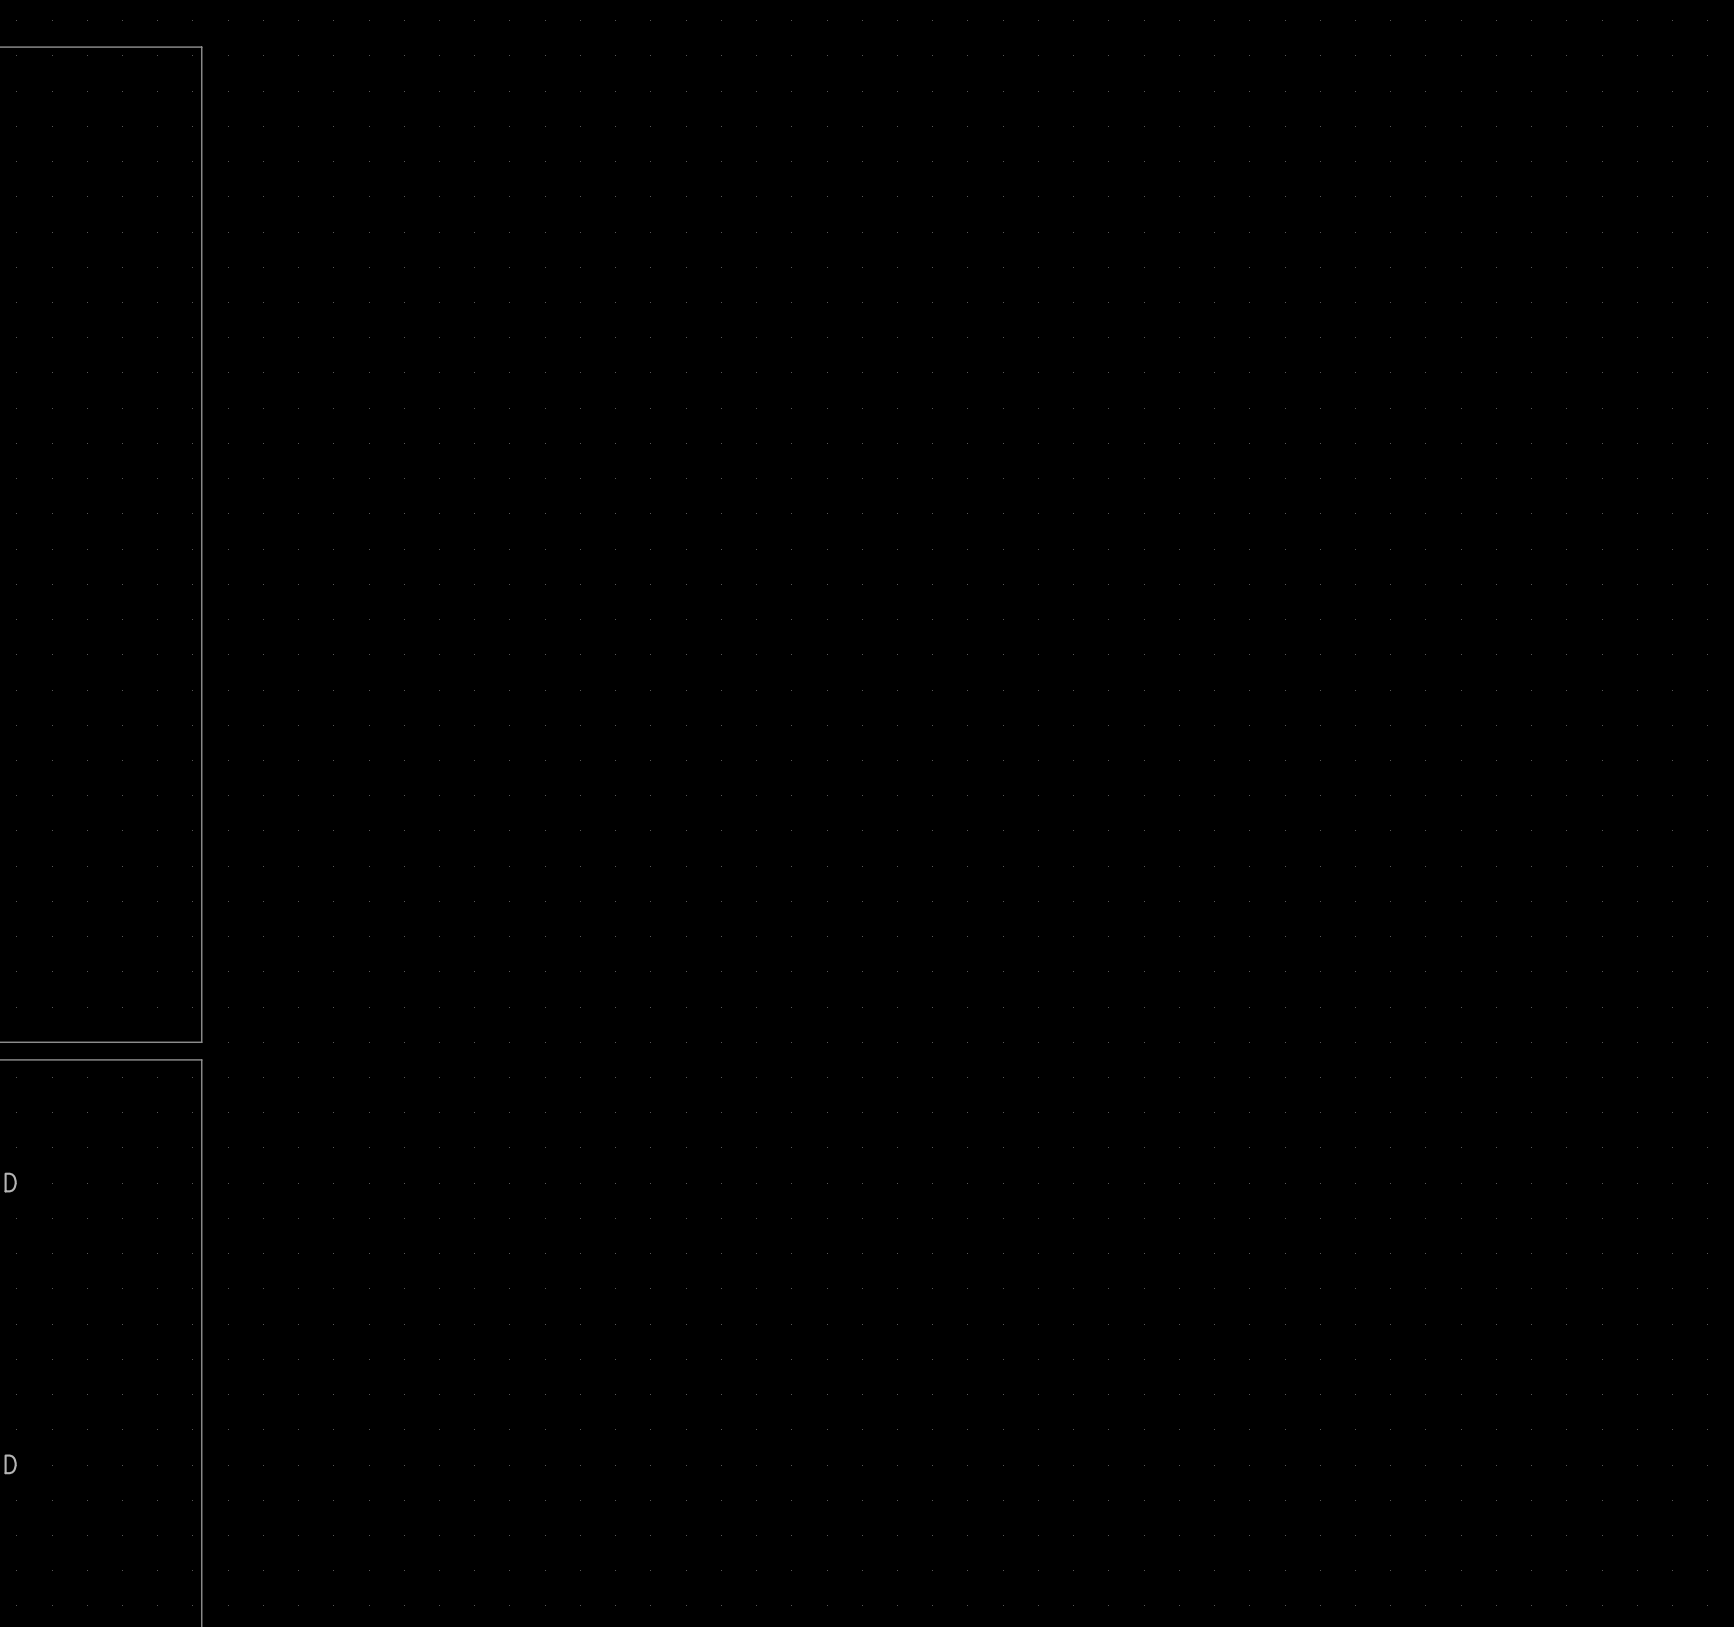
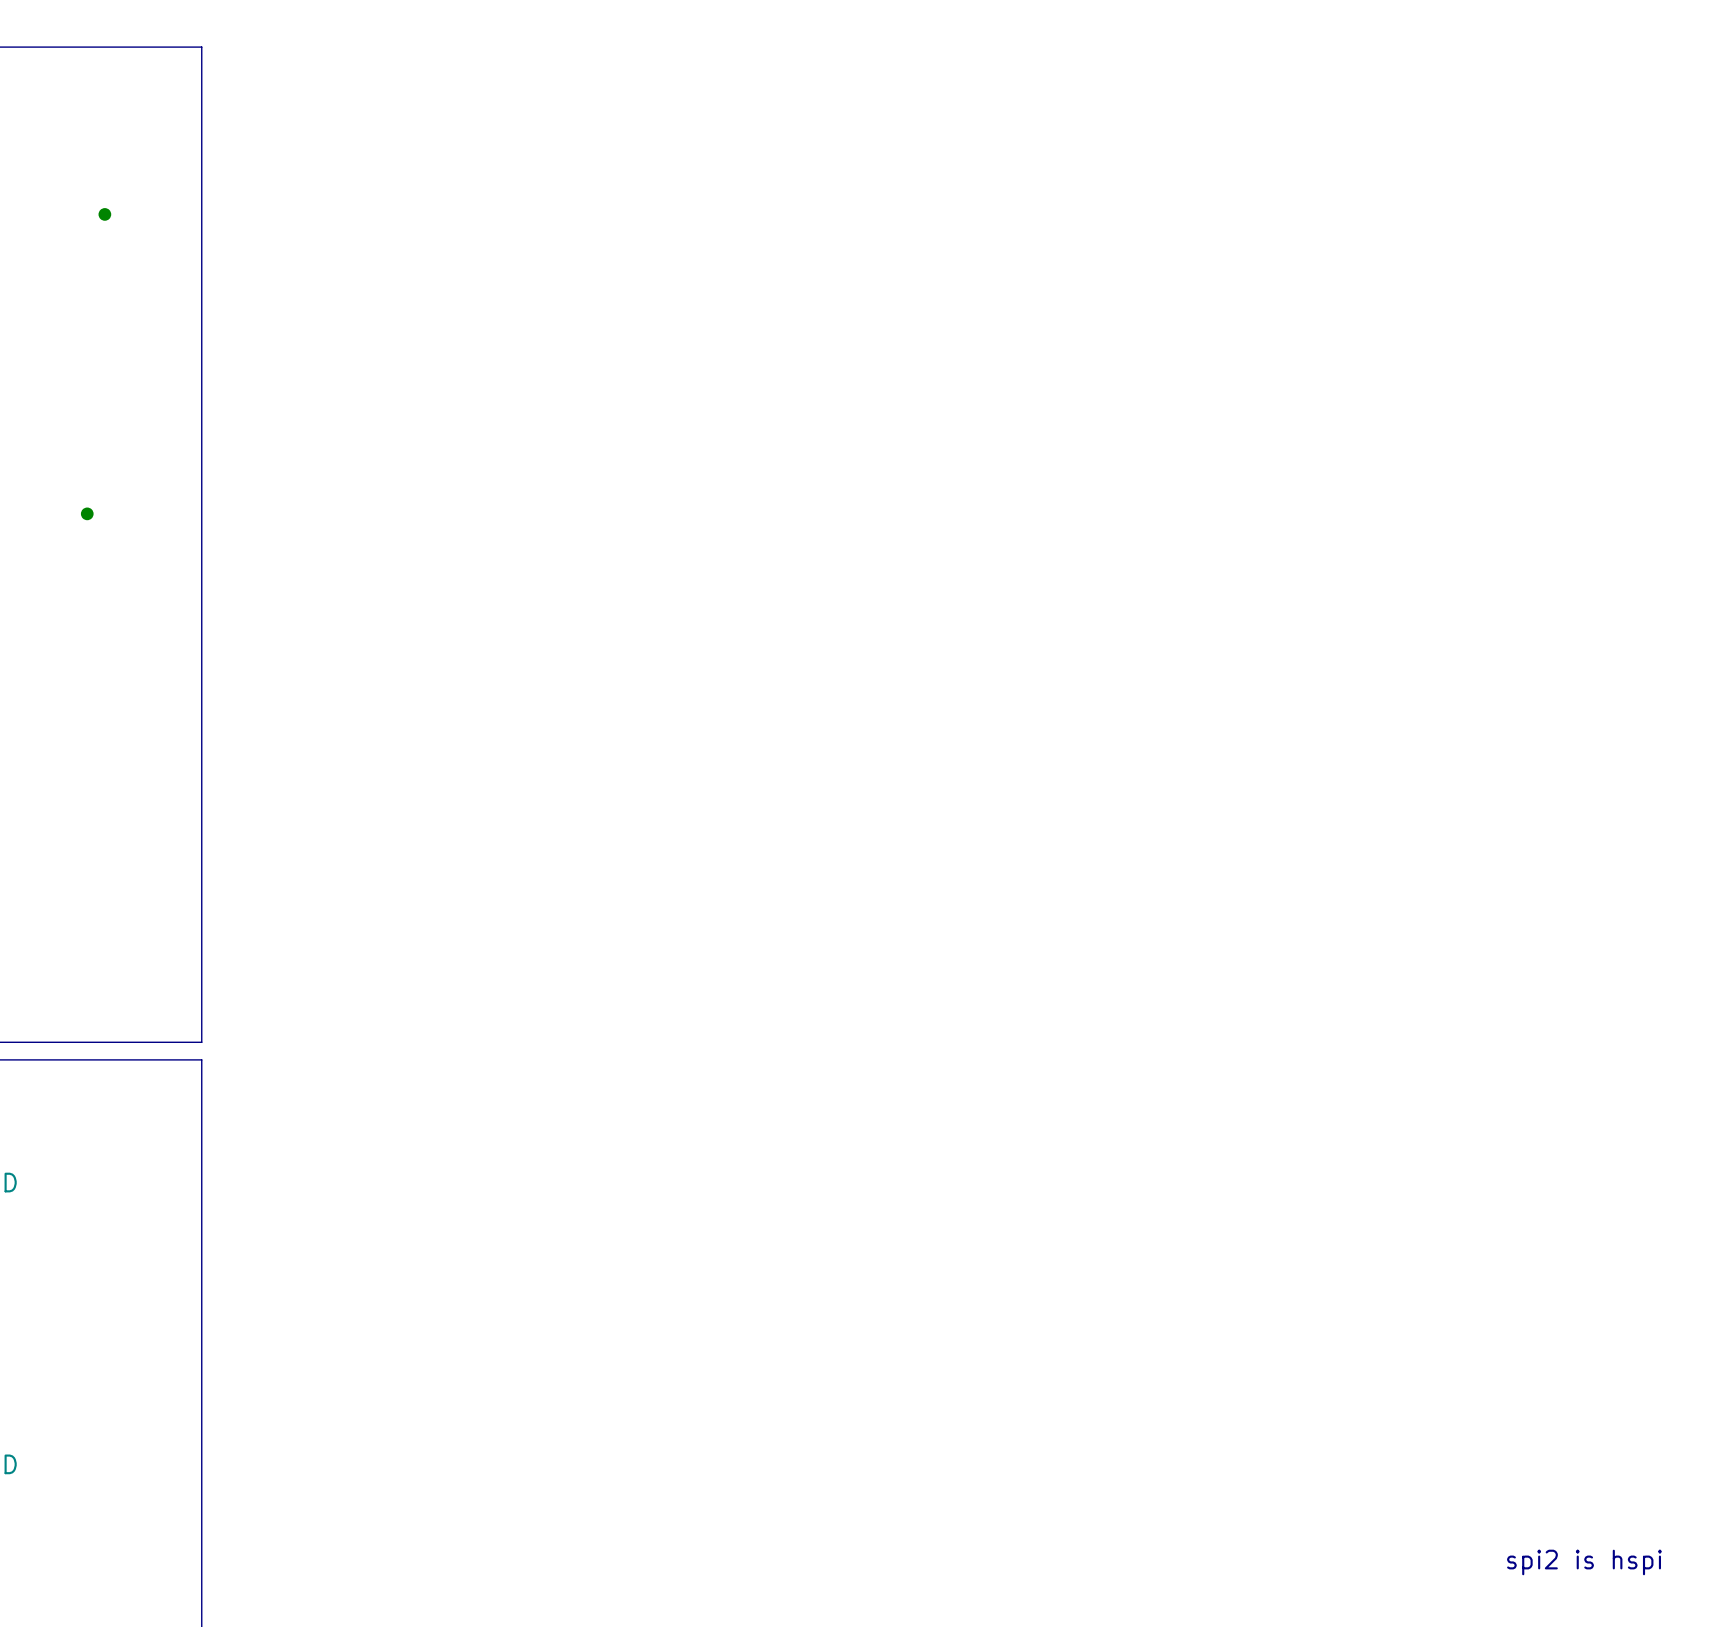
junction: none -> (104, 214)
junction: none -> (87, 513)
text: none -> spi2 is hspi (1584, 1562)

